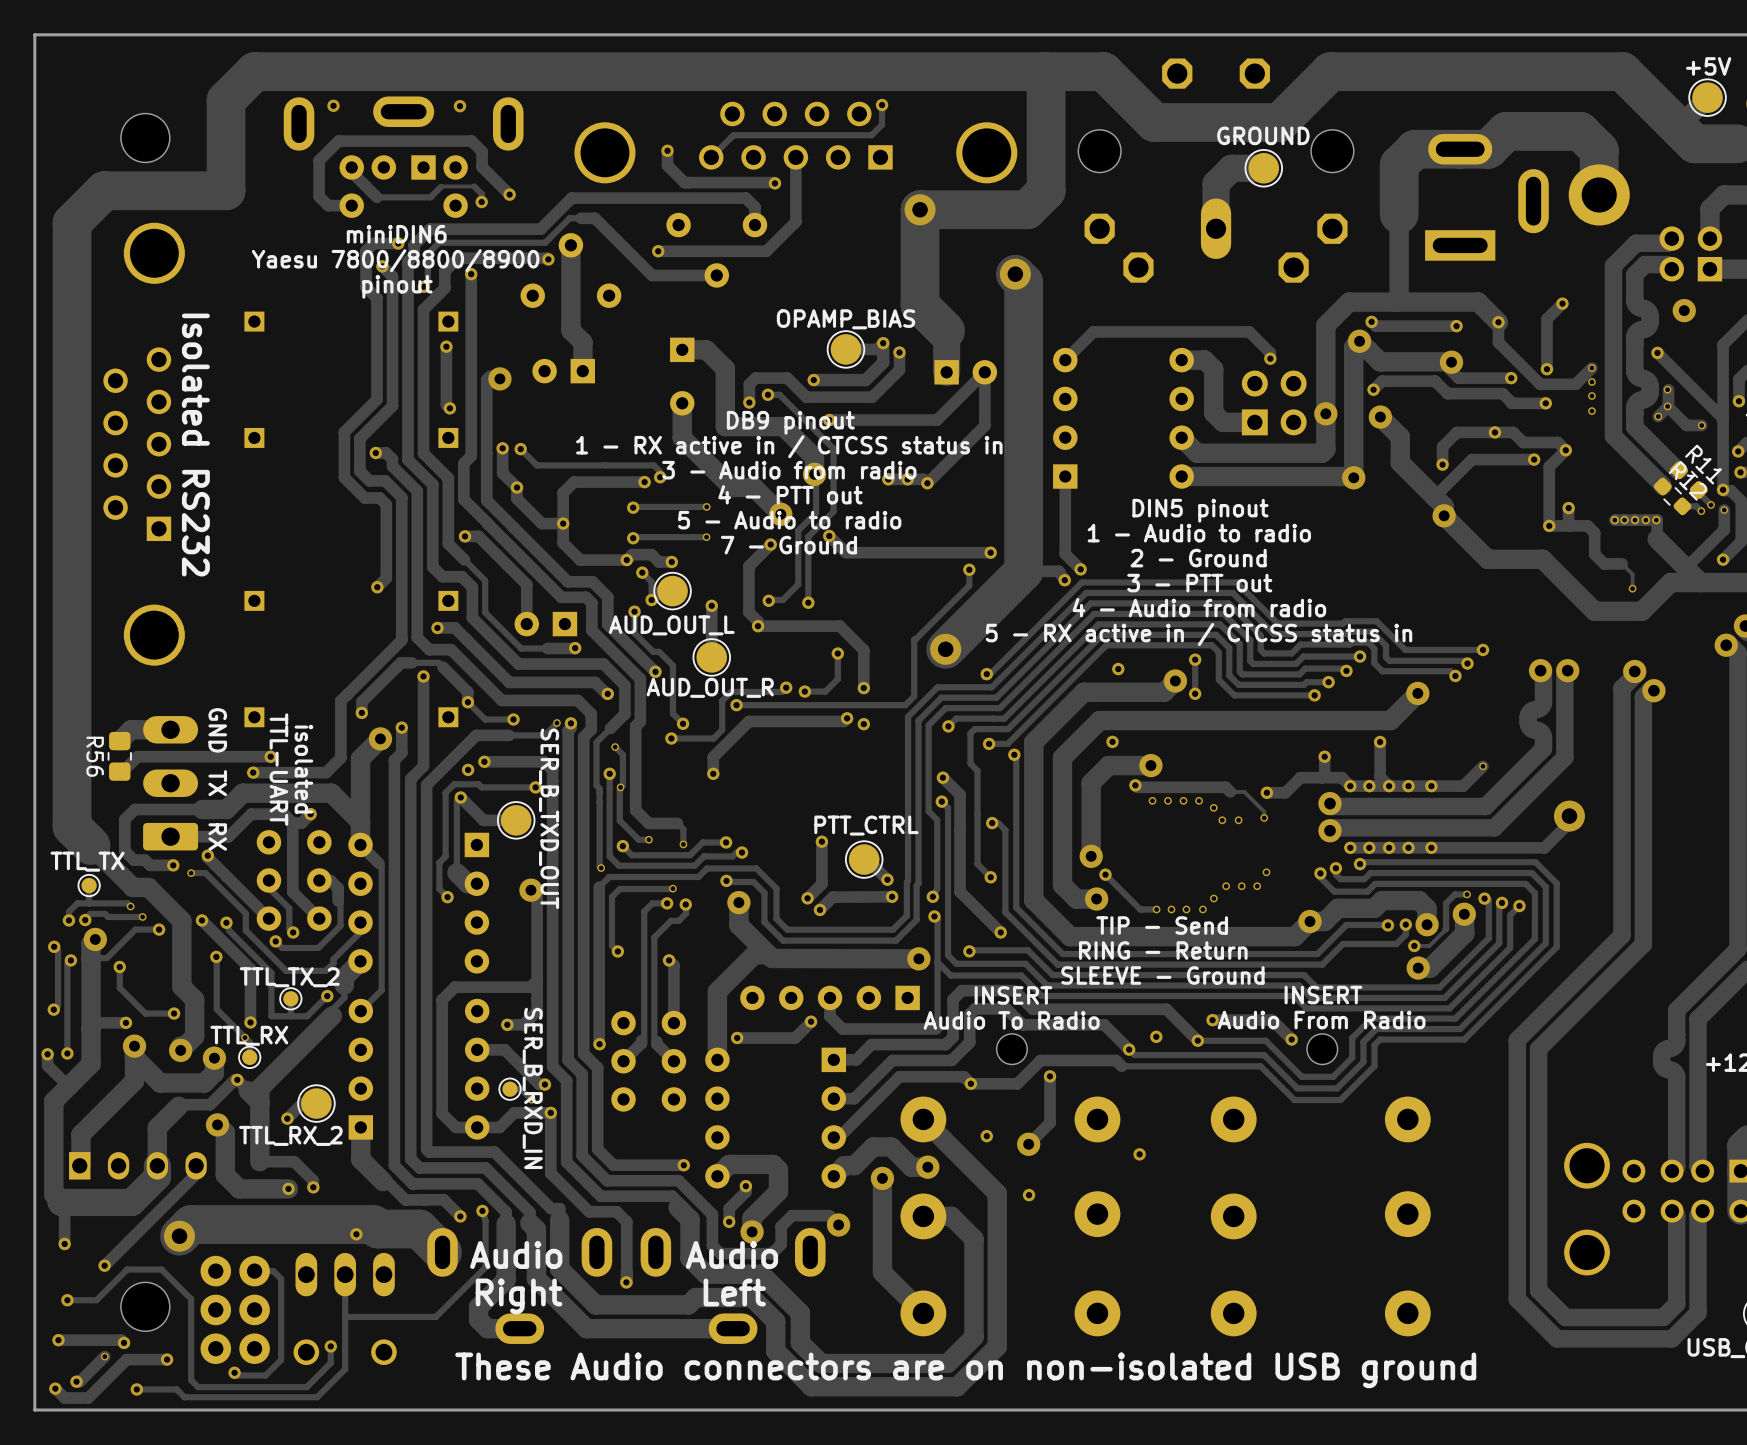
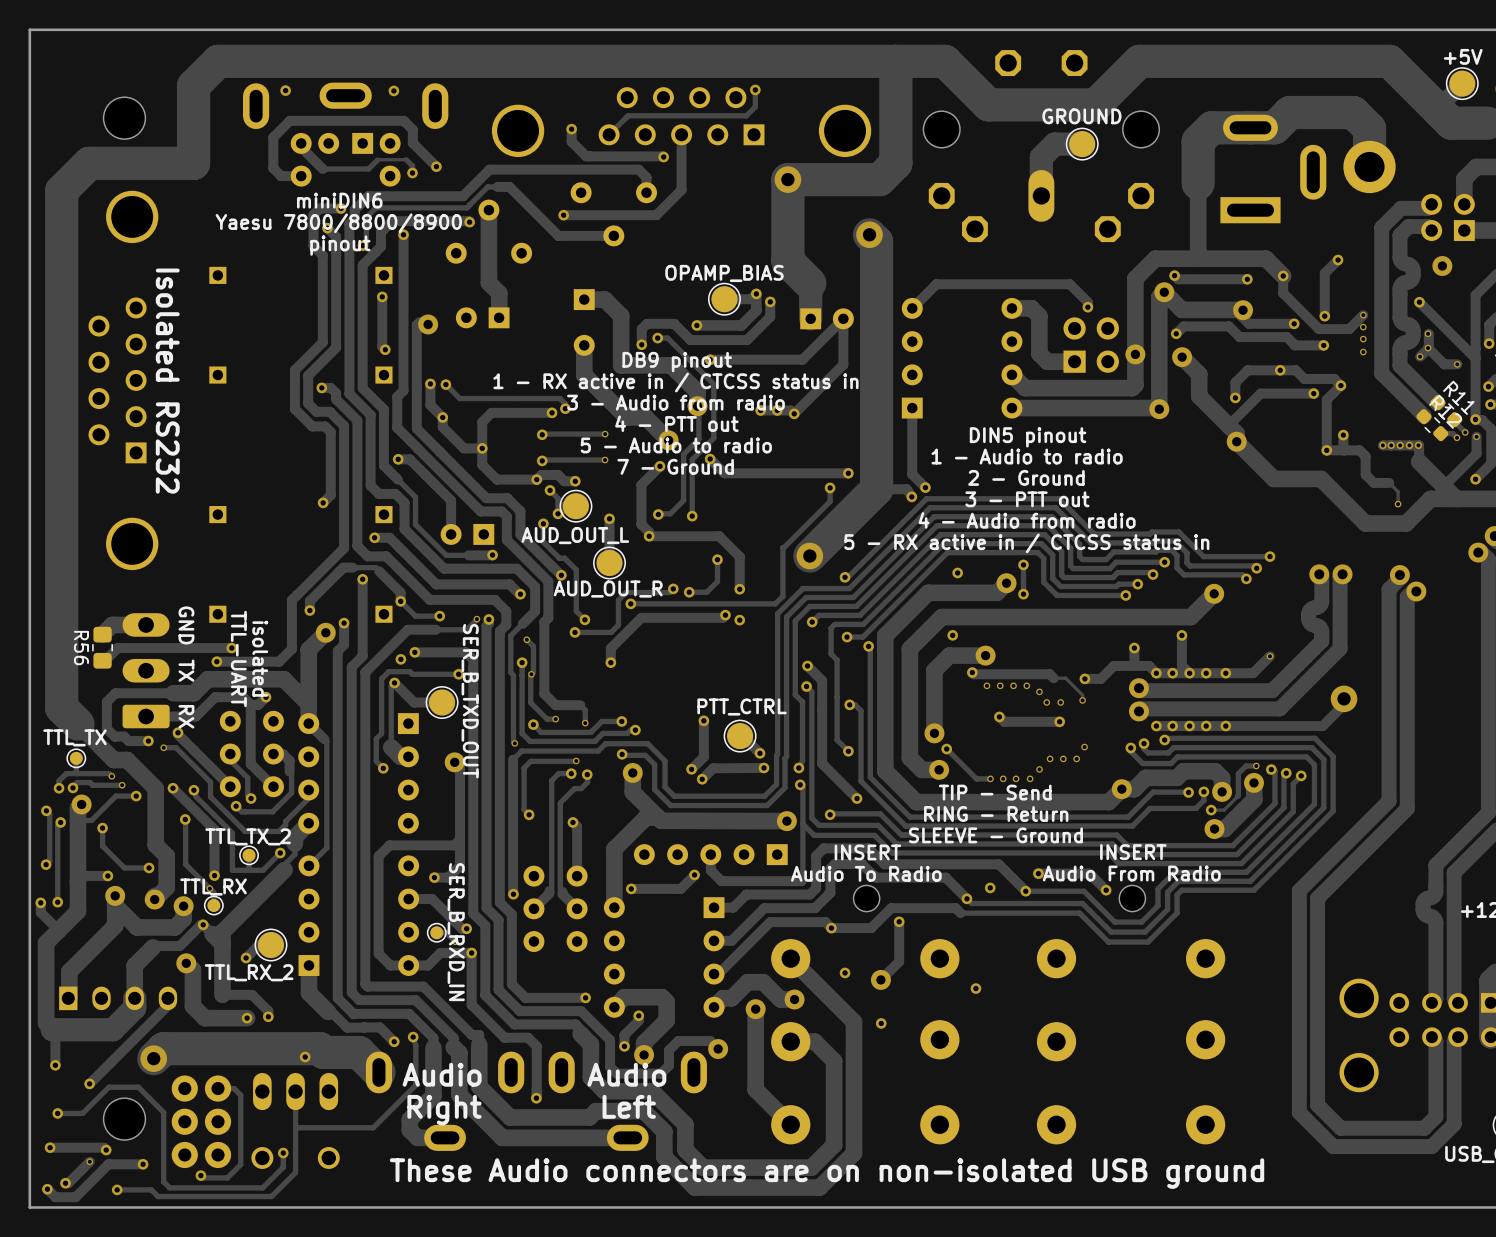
track: none -> (999, 716) (1004, 721) (1059, 721)
via: none -> (999, 716)
via: none -> (1059, 721)

